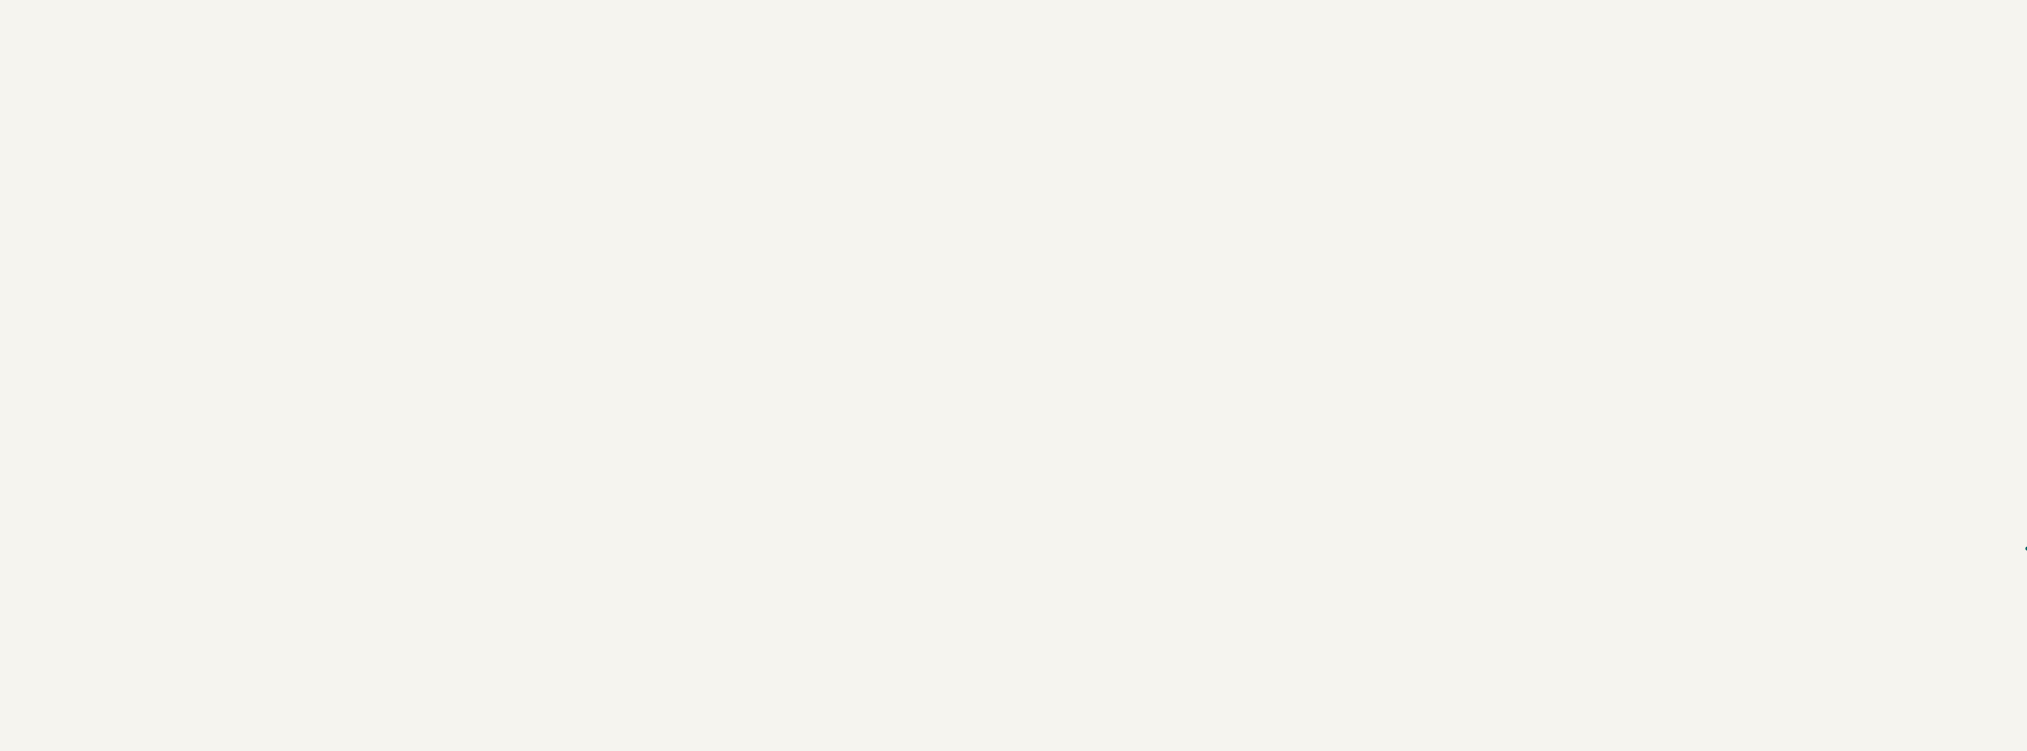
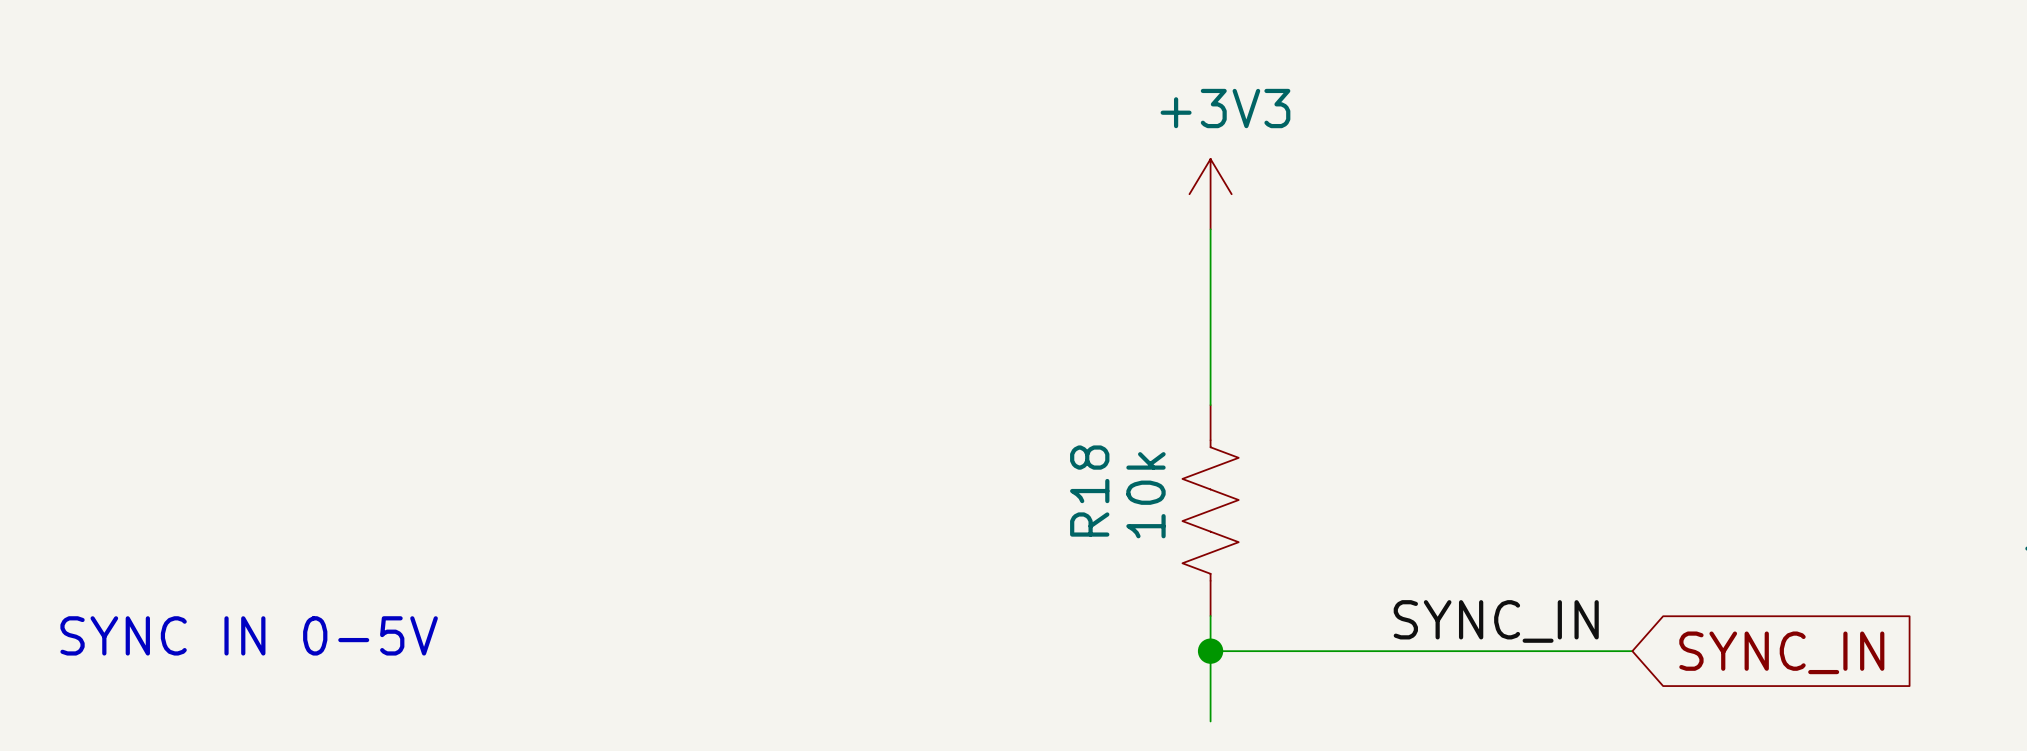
power symbol: none -> +3V3 (1210, 194)
wire: none -> (1210, 229) (1210, 405)
R18: none -> 10k (1210, 510)
wire: none -> (1210, 616) (1210, 721)
label: none -> SYNC_IN (1496, 621)
text: none -> SYNC IN 0-5V (249, 635)
wire: none -> (1210, 651) (1632, 651)
junction: none -> (1210, 651)
global label: none -> SYNC_IN (1781, 652)

